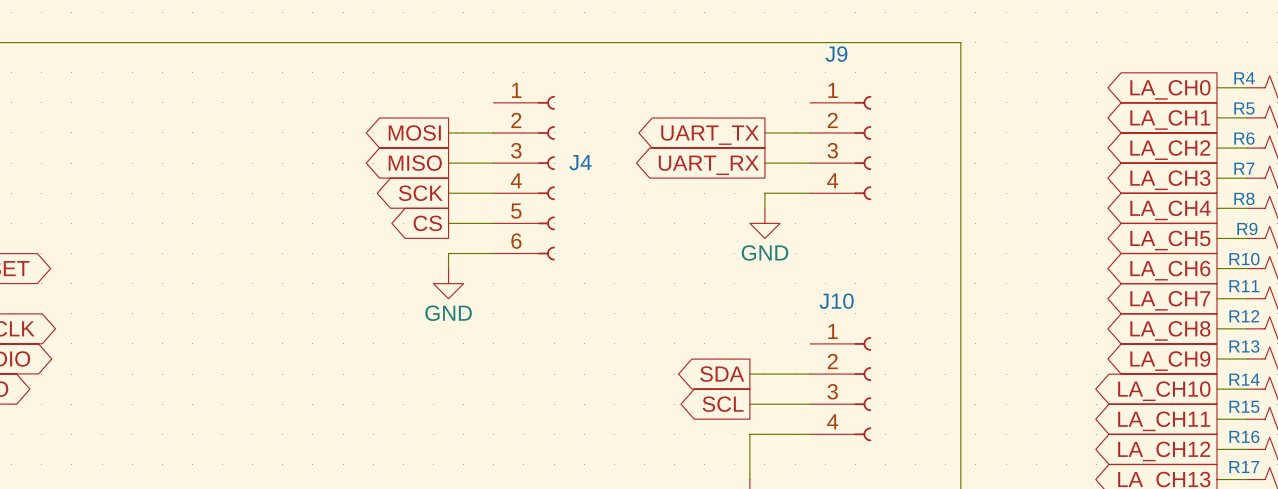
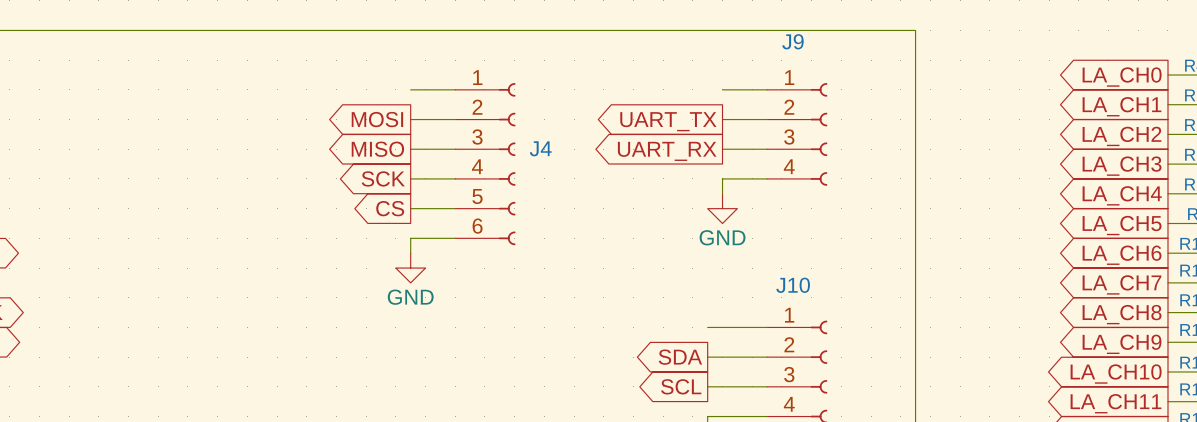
wire: none -> (410, 89) (455, 89)
wire: none -> (722, 89) (767, 89)
wire: none -> (707, 327) (767, 327)

